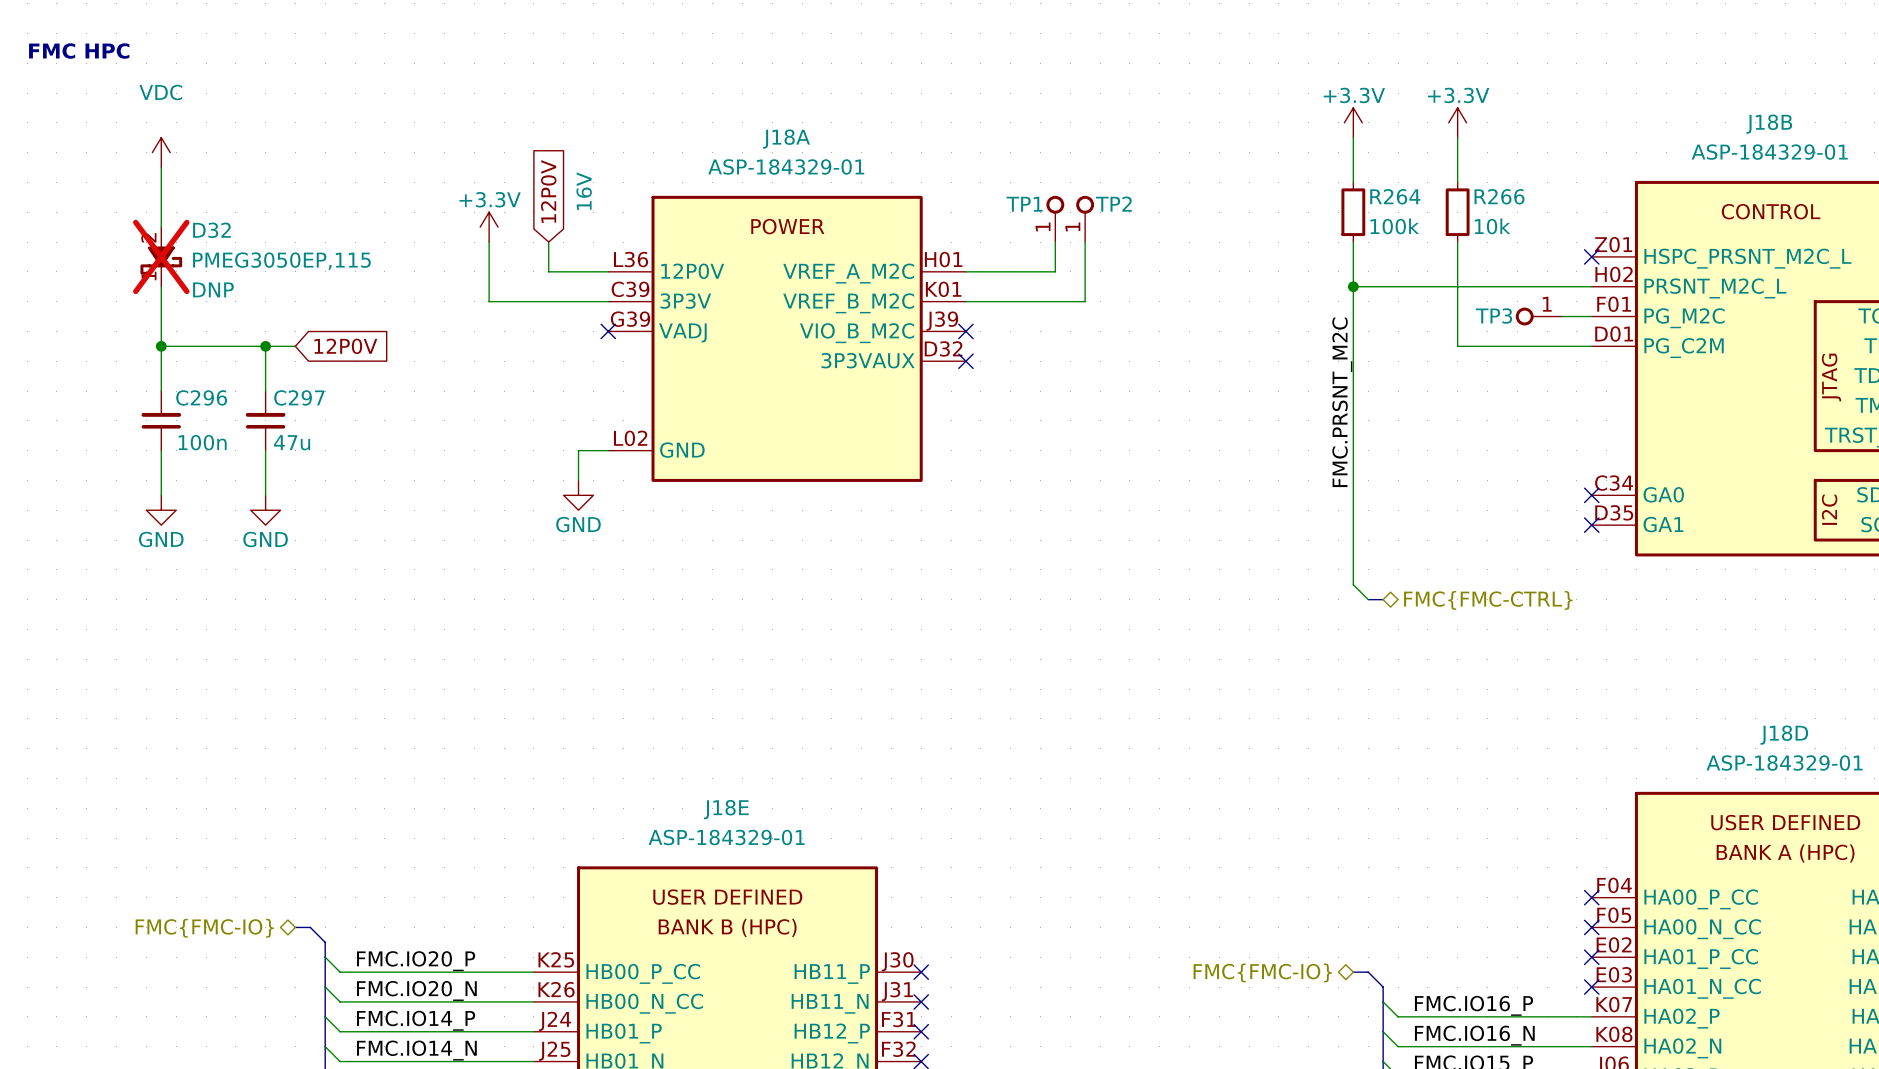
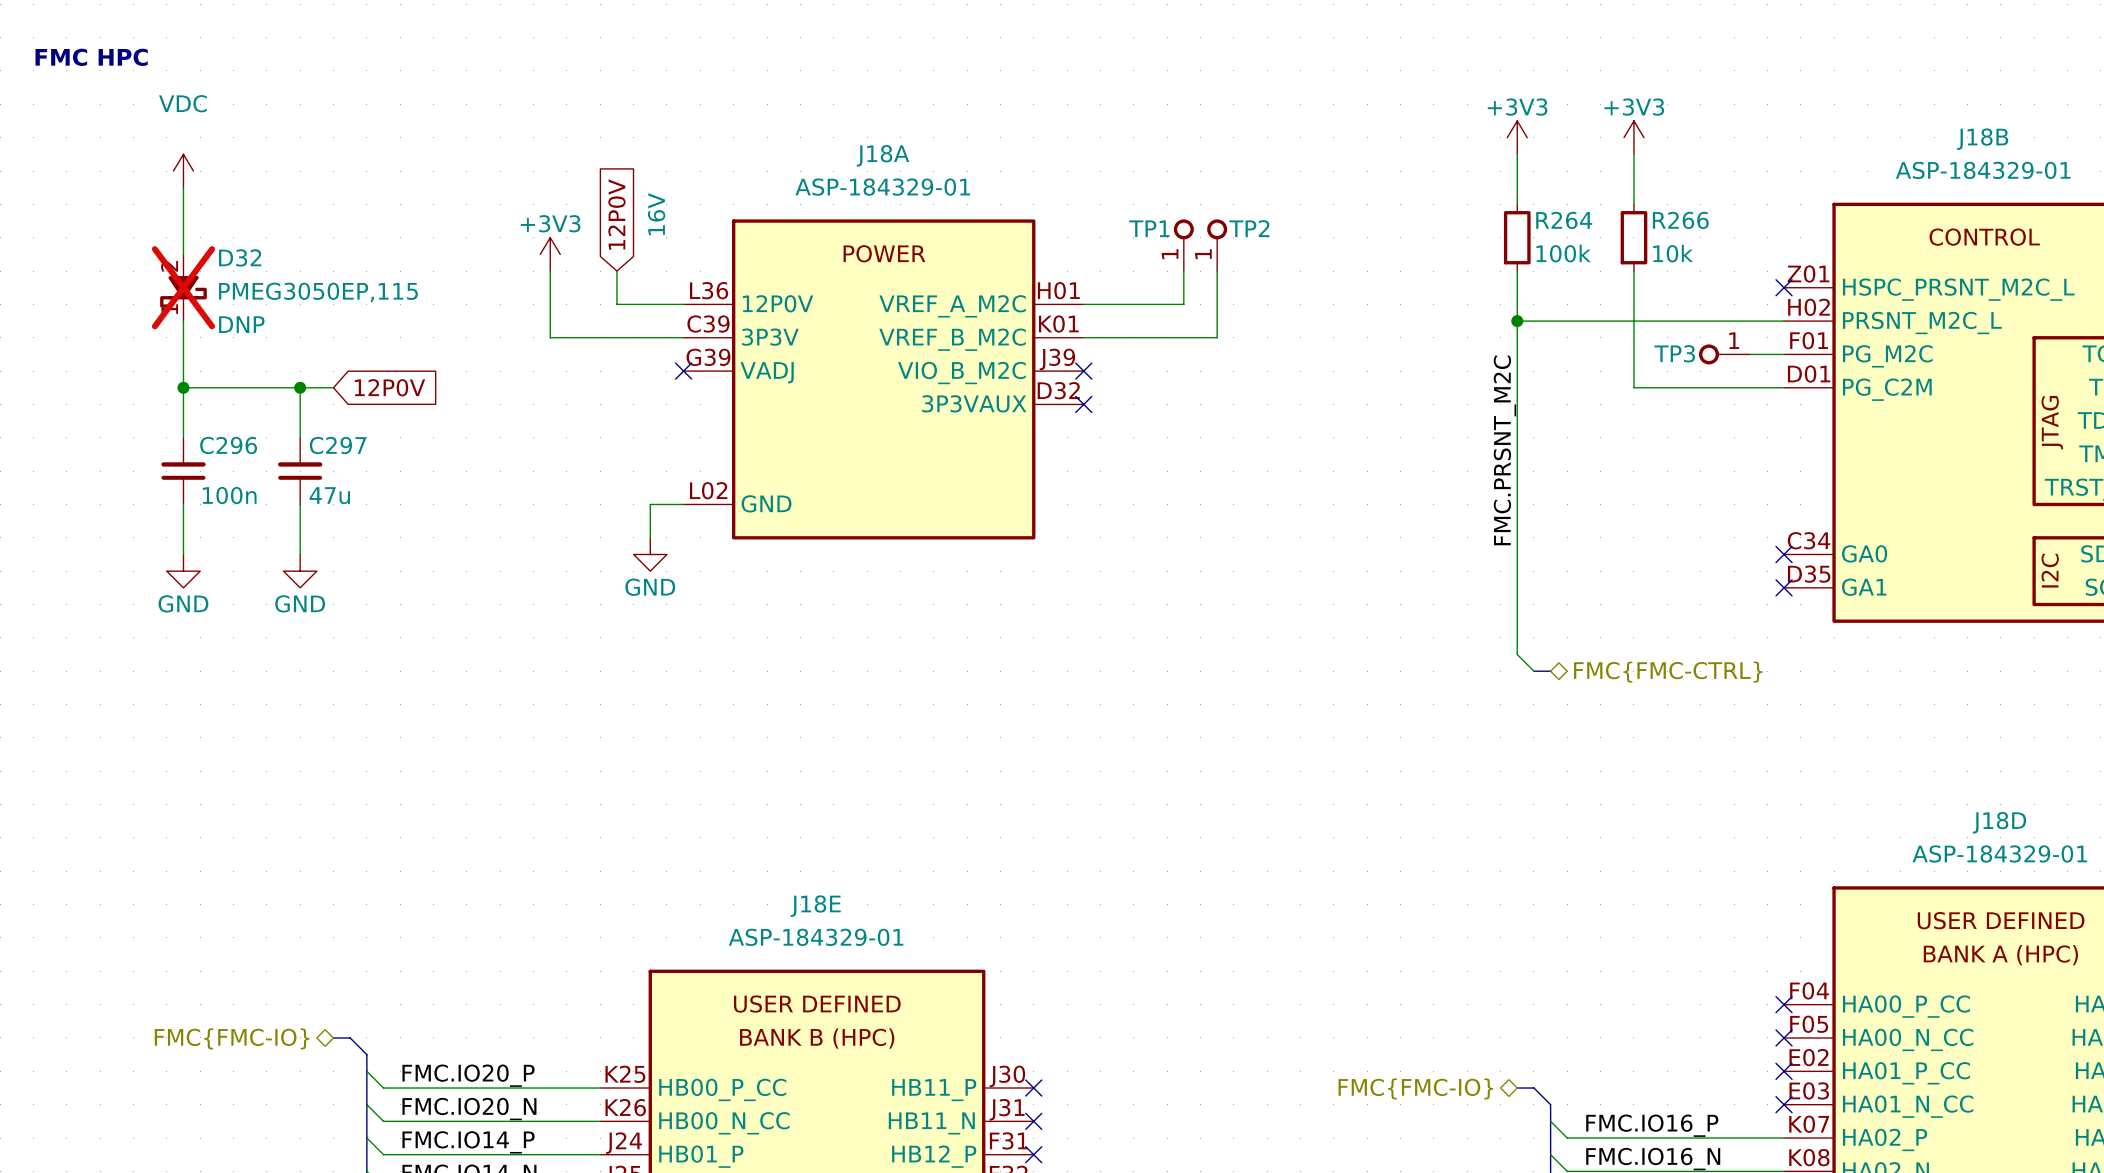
power symbol: +3.3V (1353, 122) -> +3V3 (1517, 137)
power symbol: +3.3V (1457, 122) -> +3V3 (1633, 137)
power symbol: +3.3V (489, 227) -> +3V3 (550, 254)

